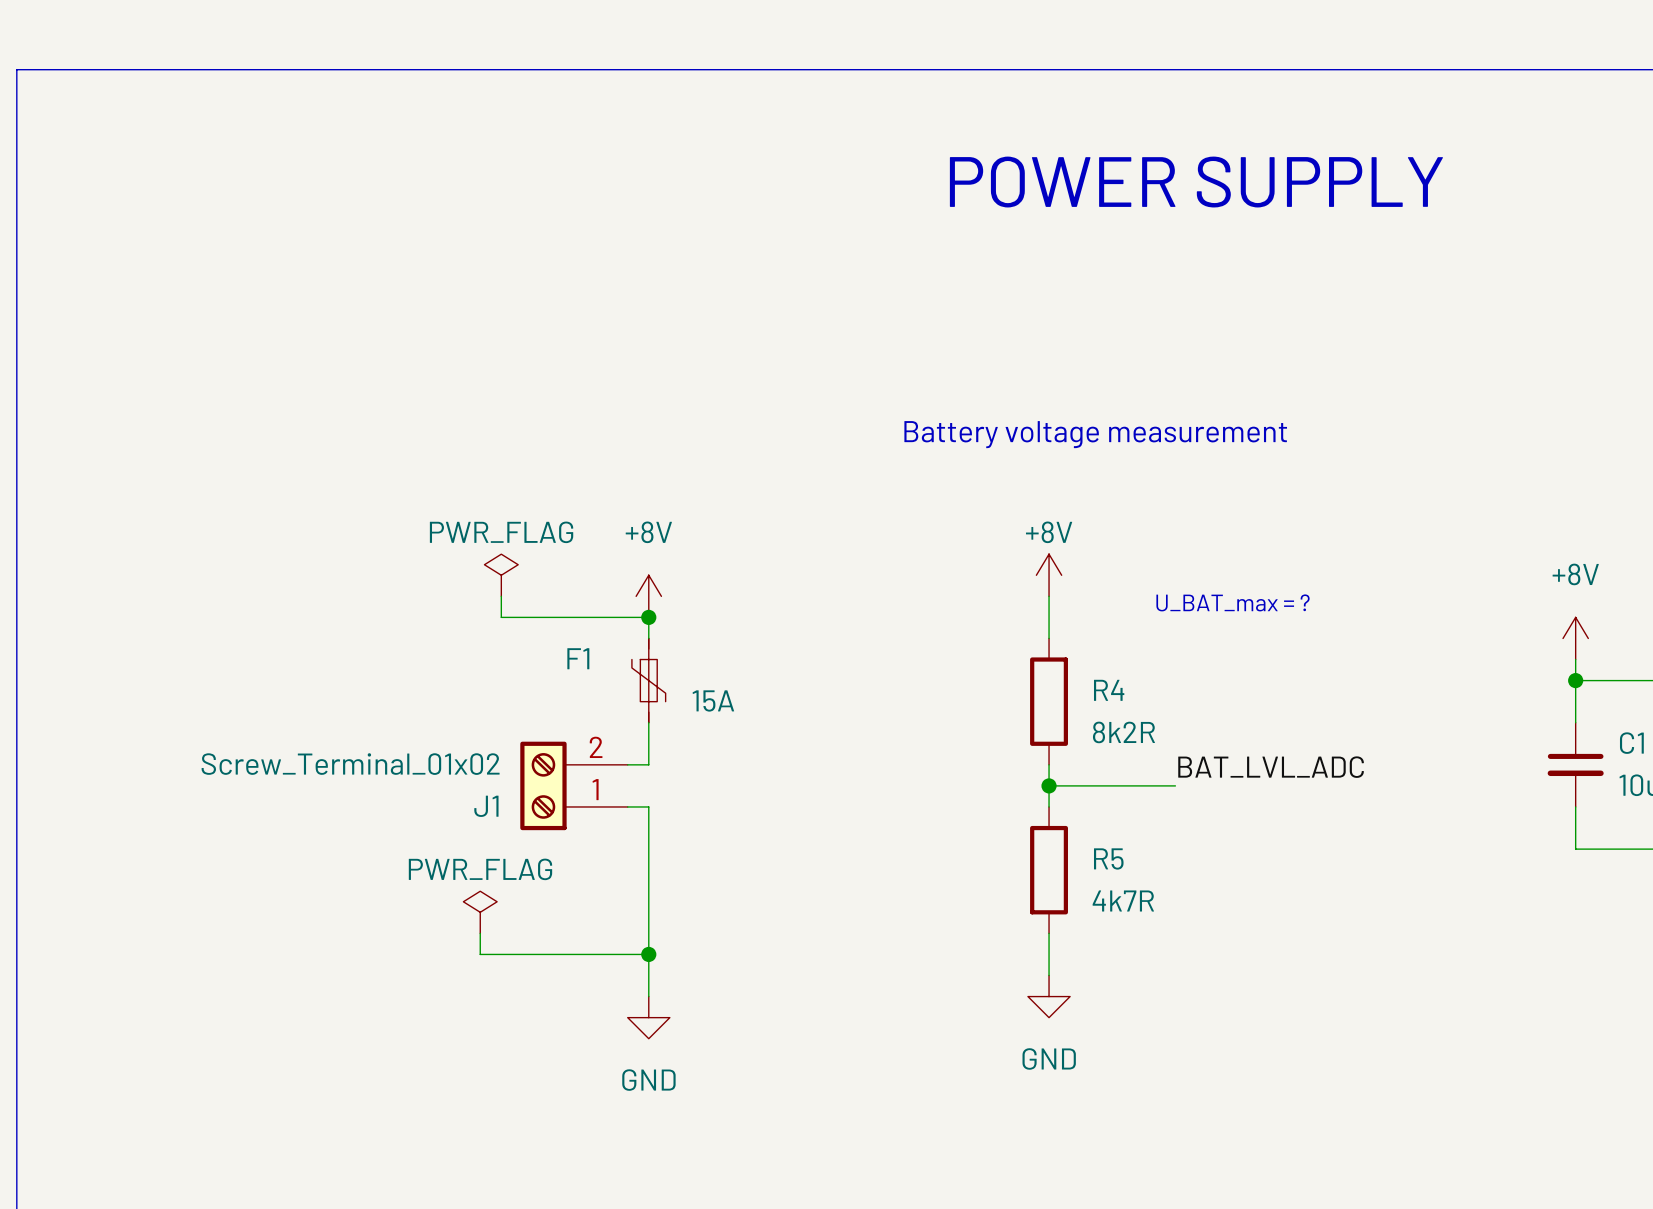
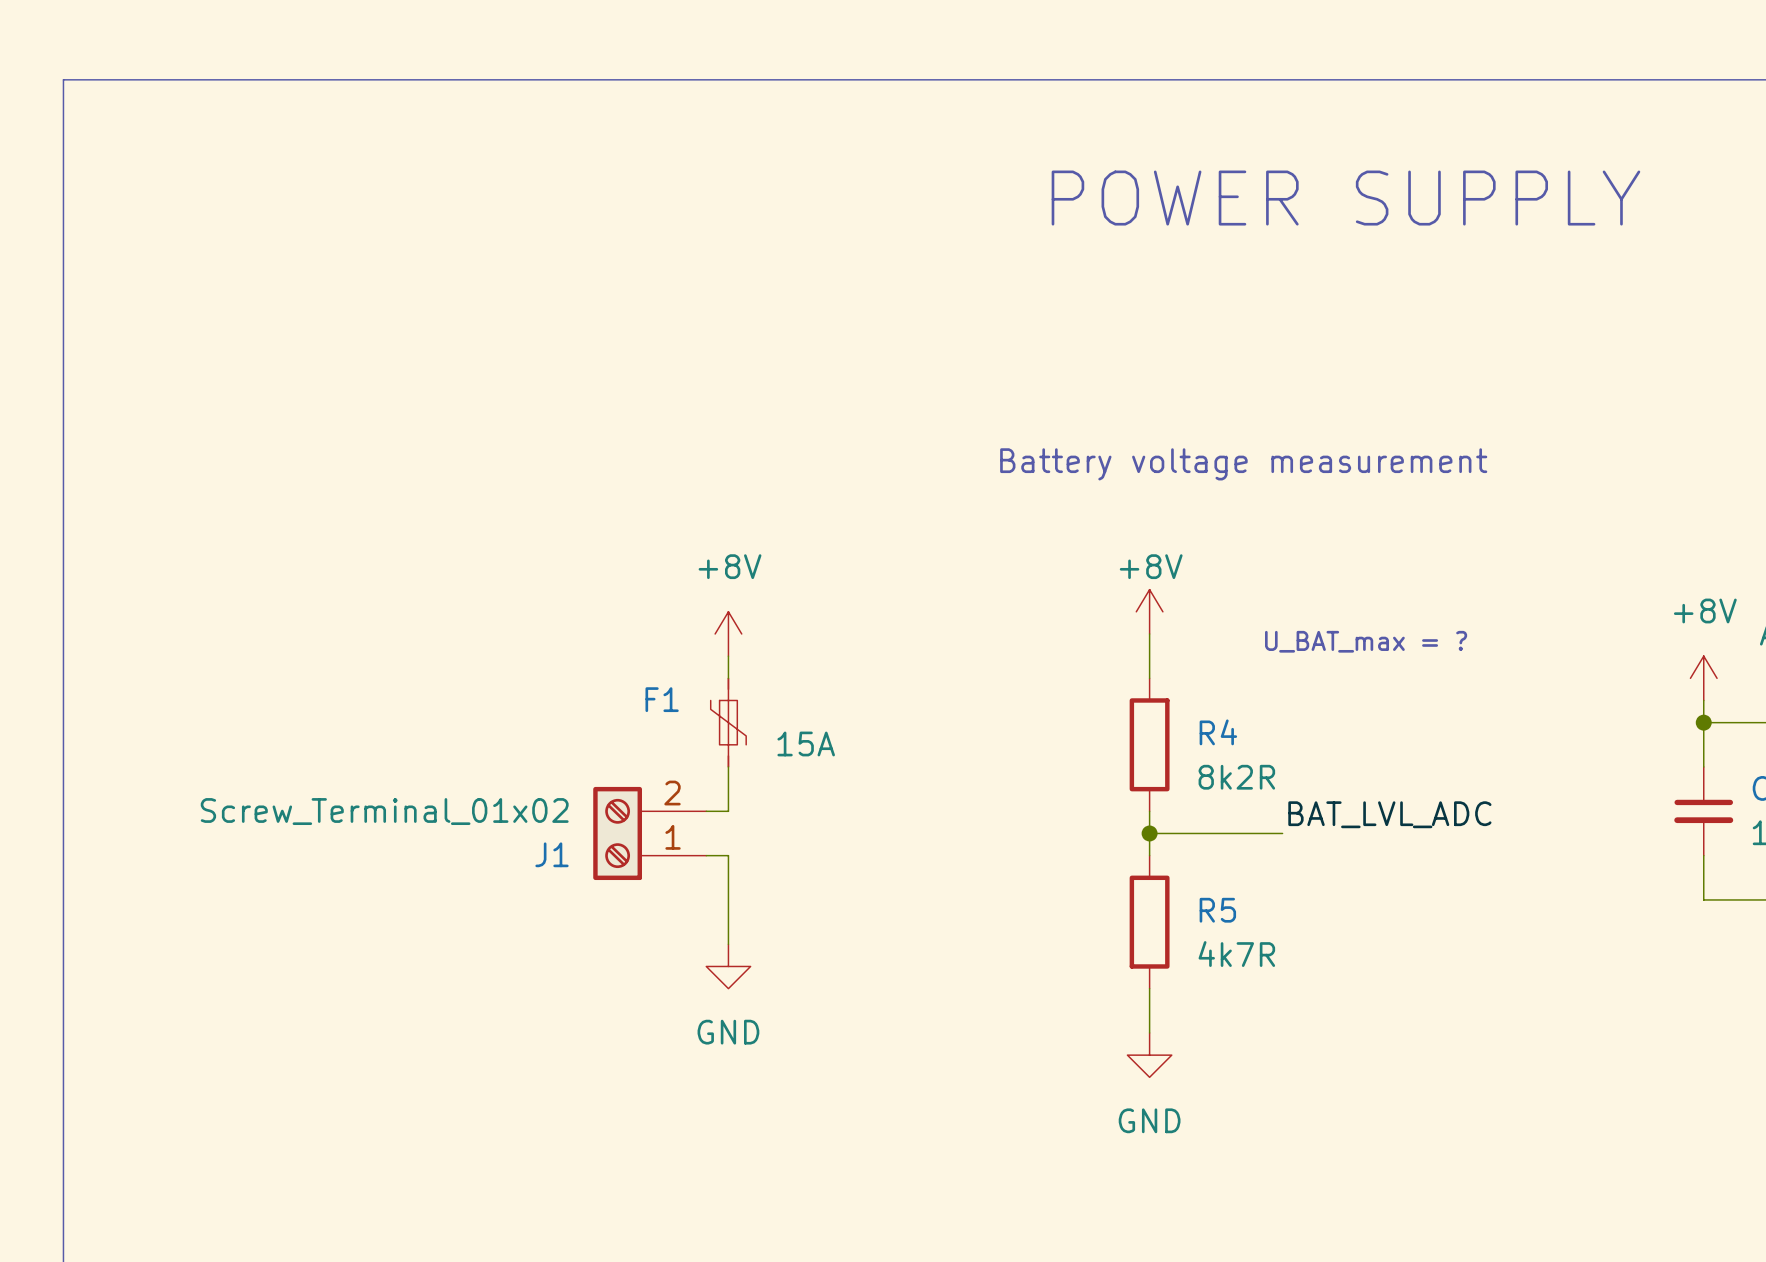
power symbol: PWR_FLAG (501, 575) -> none
wire: (501, 596) (501, 617) (648, 617) -> none
junction: (648, 617) -> none
wire: (648, 891) (648, 996) -> none
power symbol: PWR_FLAG (480, 912) -> none
wire: (480, 933) (480, 954) (648, 954) -> none
junction: (648, 954) -> none
power symbol position: GND (648, 1017) -> GND (728, 966)

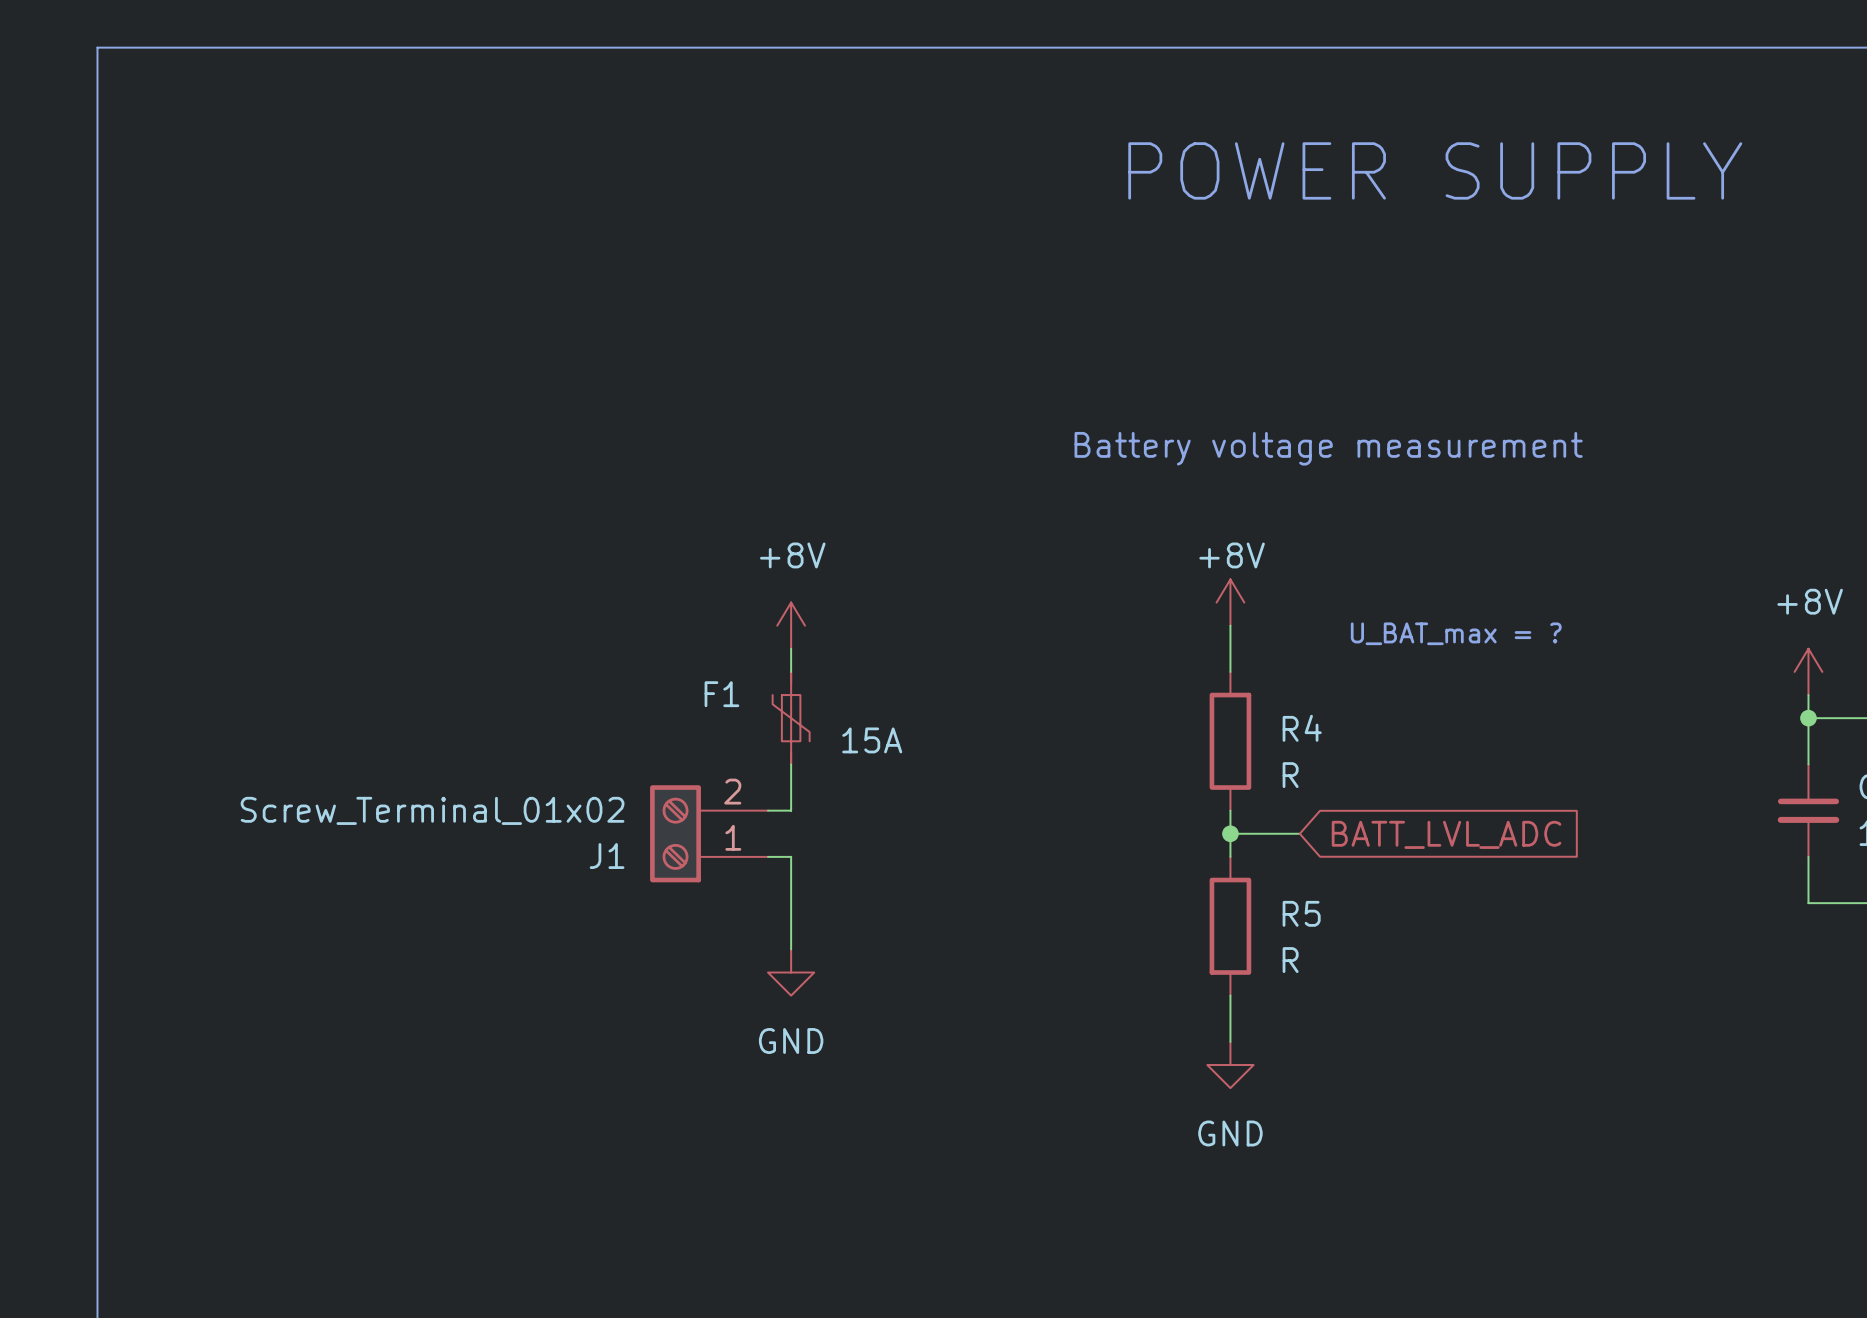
R4 value: 8k2R (1236, 777) -> R (1290, 775)
label: BAT_LVL_ADC (1389, 814) -> none
wire: (1216, 833) (1282, 833) -> none
global label: none -> BATT_LVL_ADC (1446, 834)
R5 value: 4k7R (1236, 954) -> R (1290, 960)

